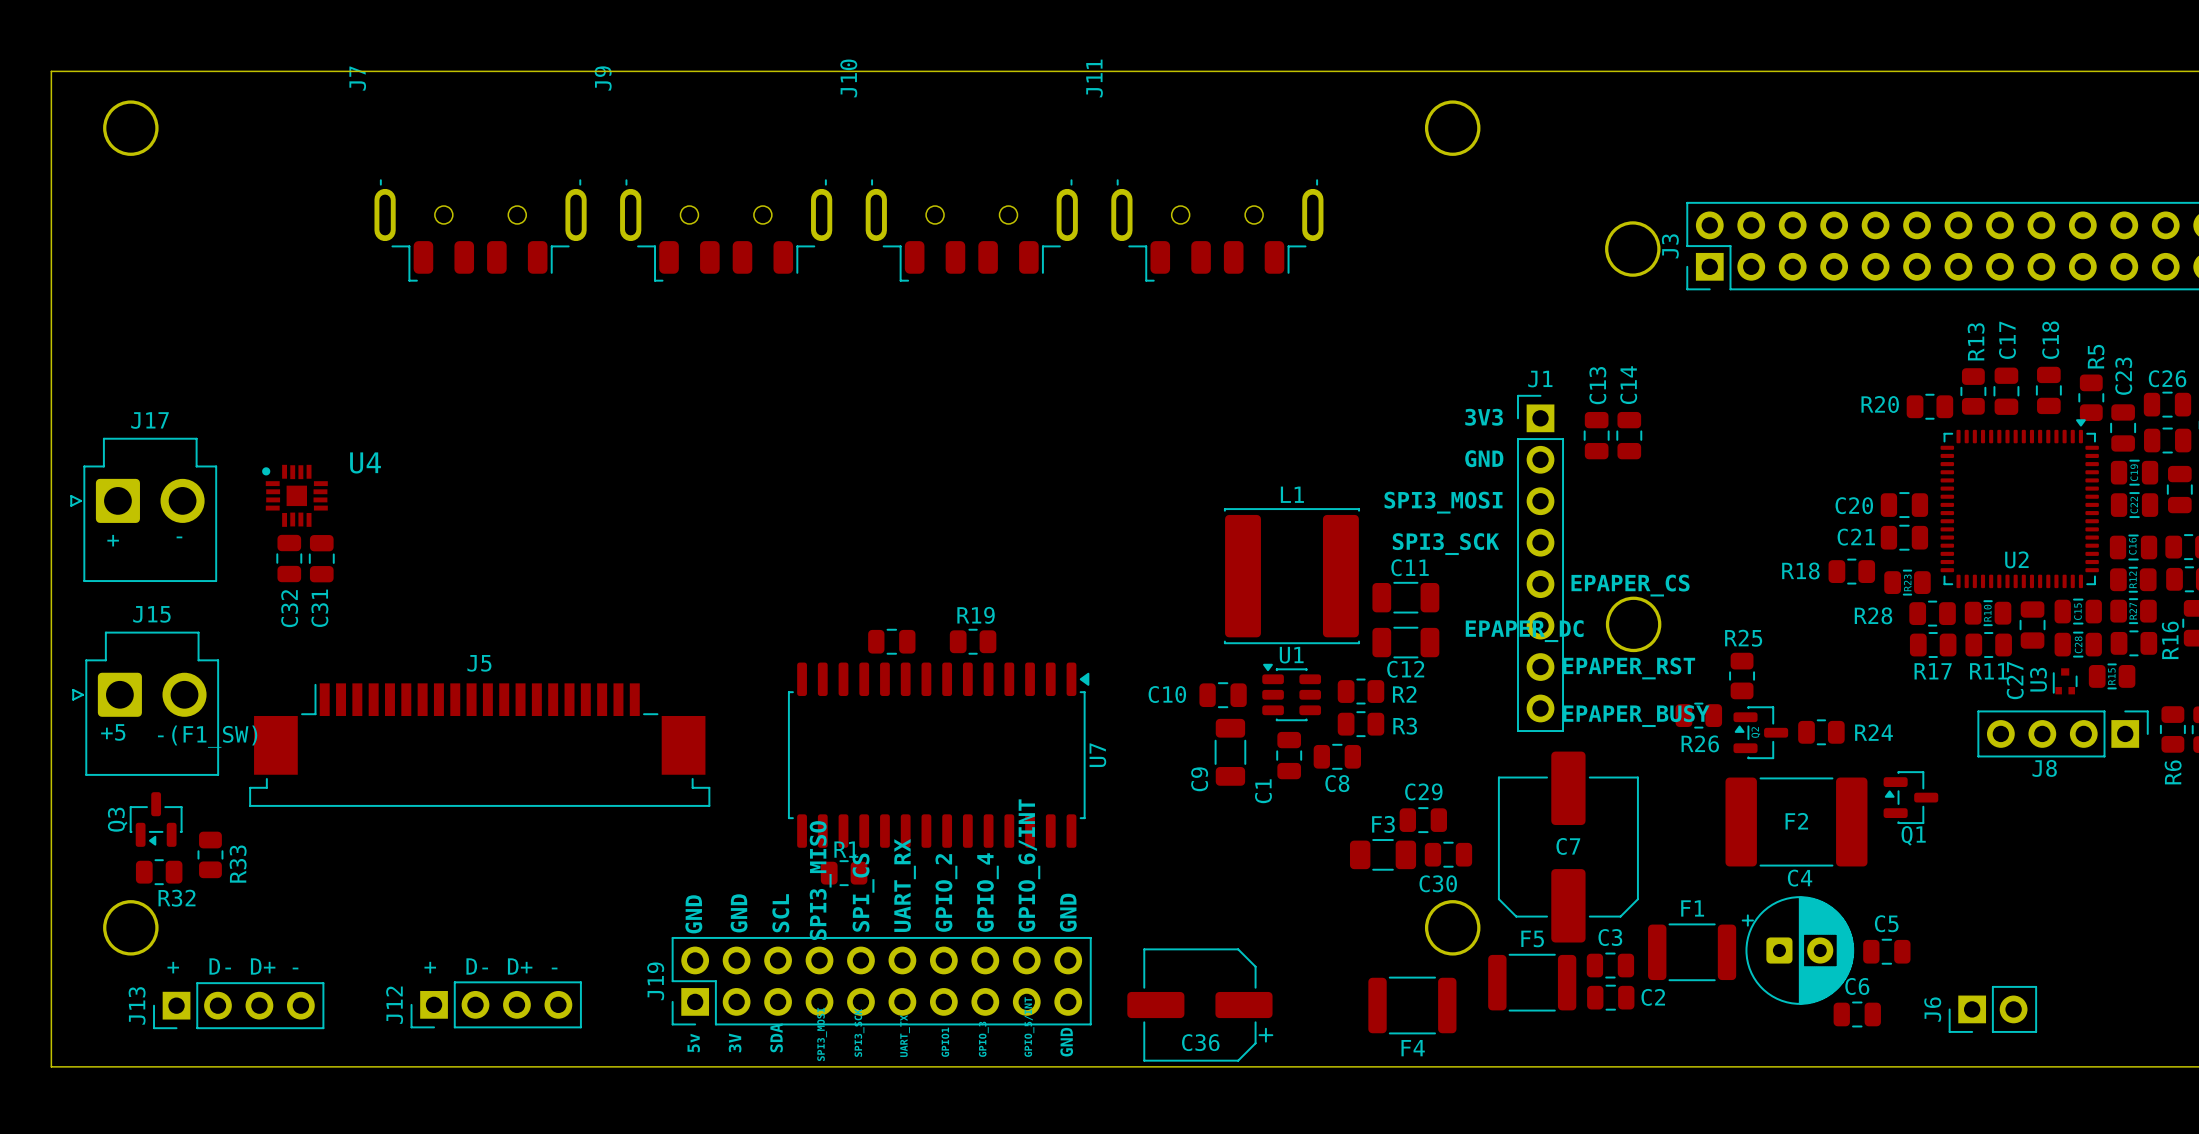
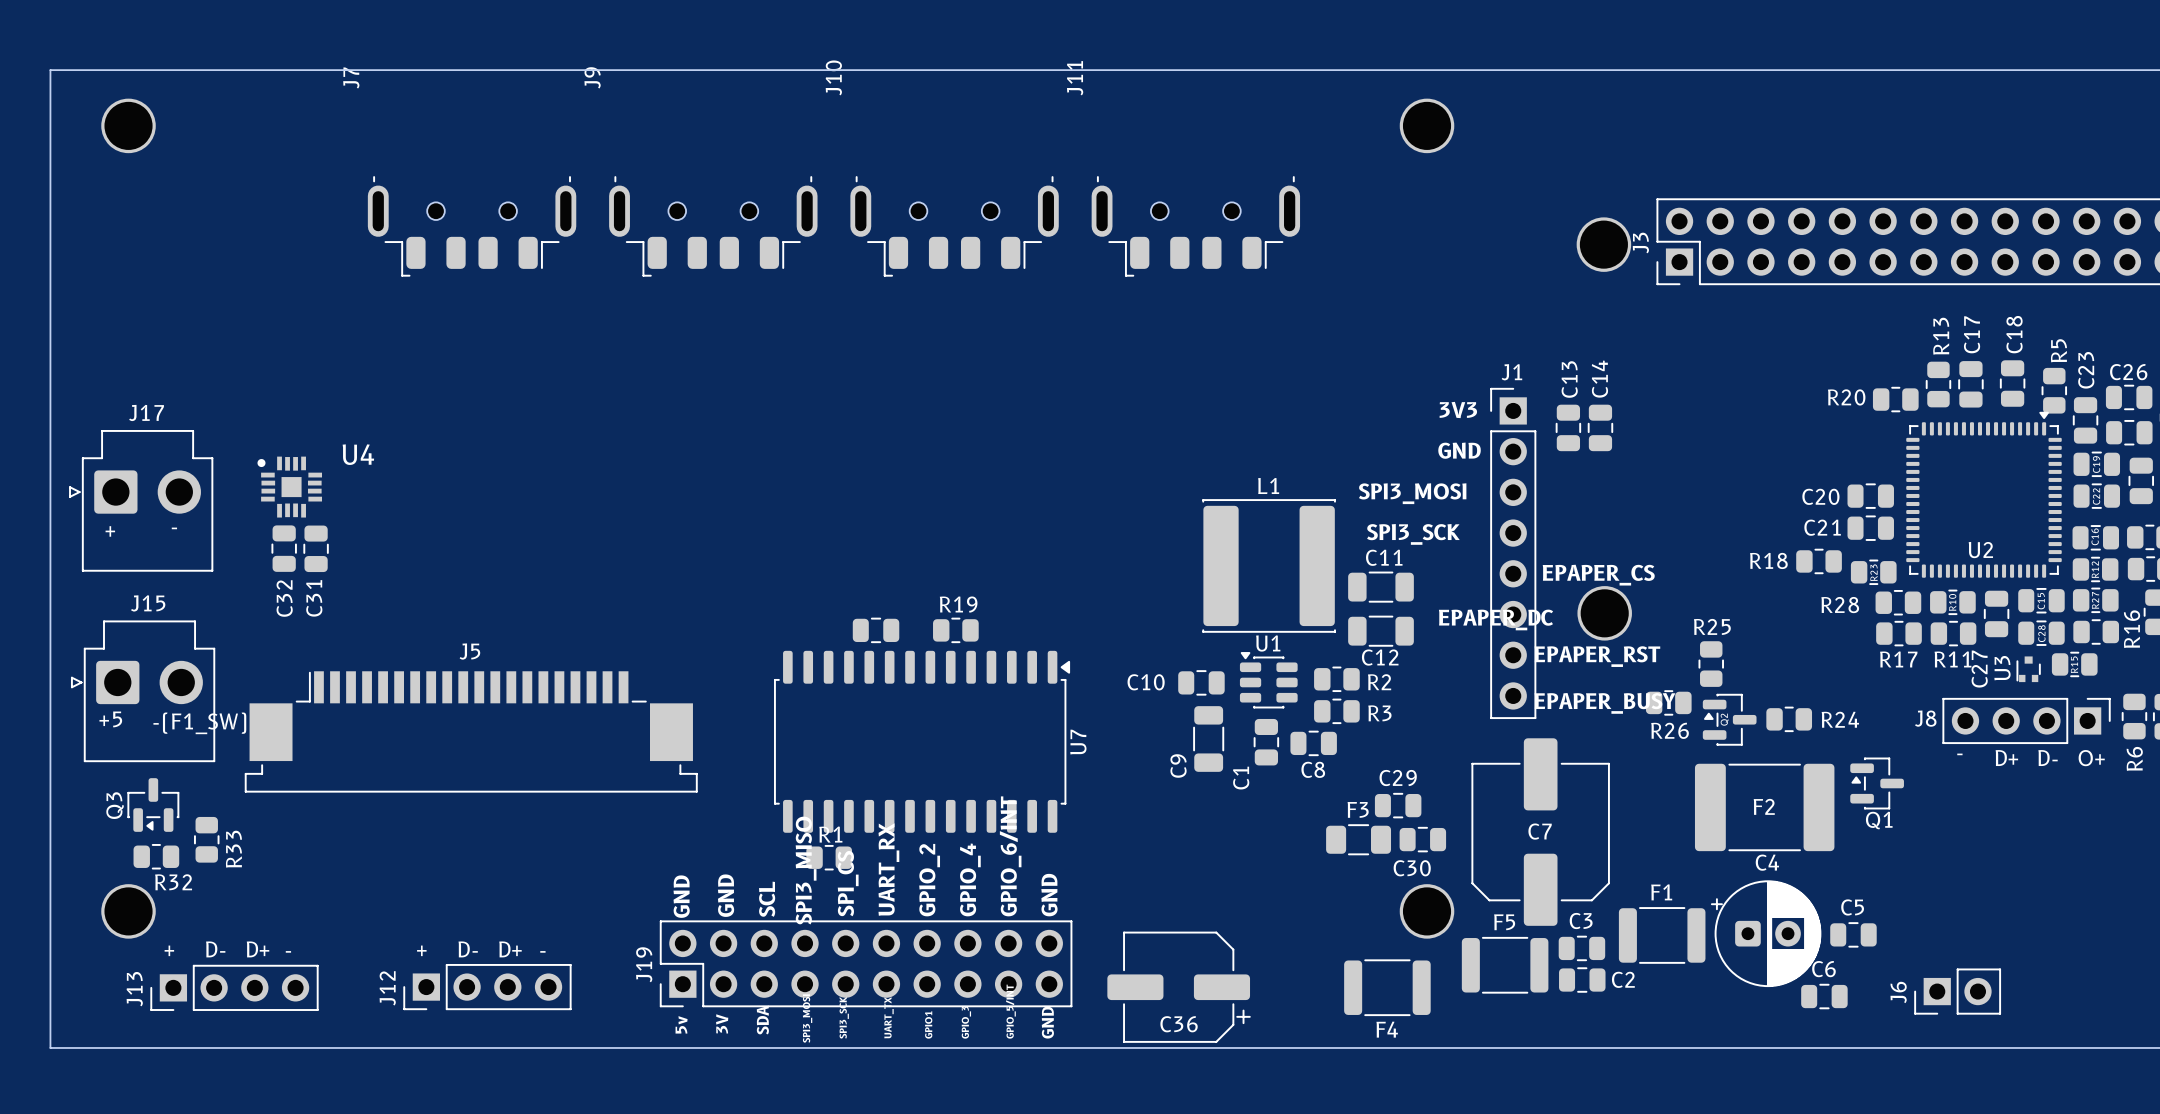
text: none -> - (1959, 754)
J8 name position: J8 (2044, 768) -> J8 (1925, 718)
text: none -> D+ (2006, 758)
text: none -> D- (2048, 758)
text: none -> O+ (2091, 758)

